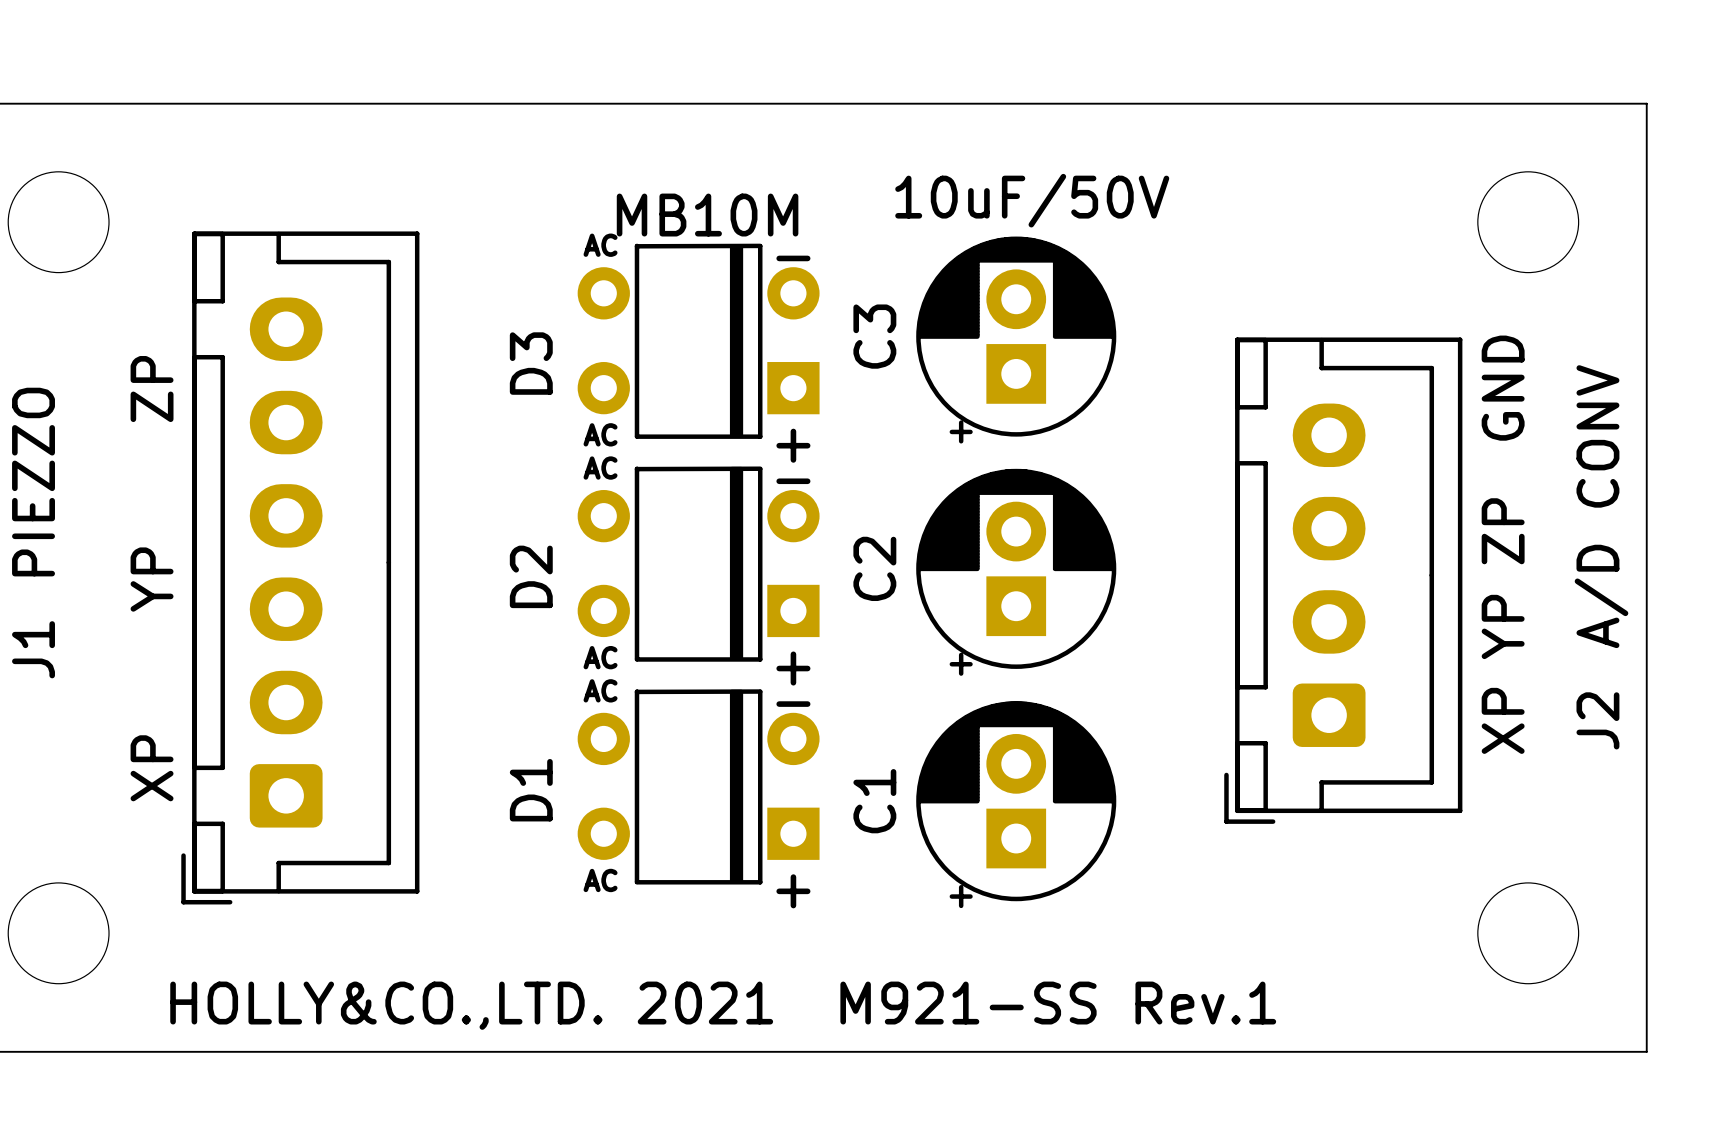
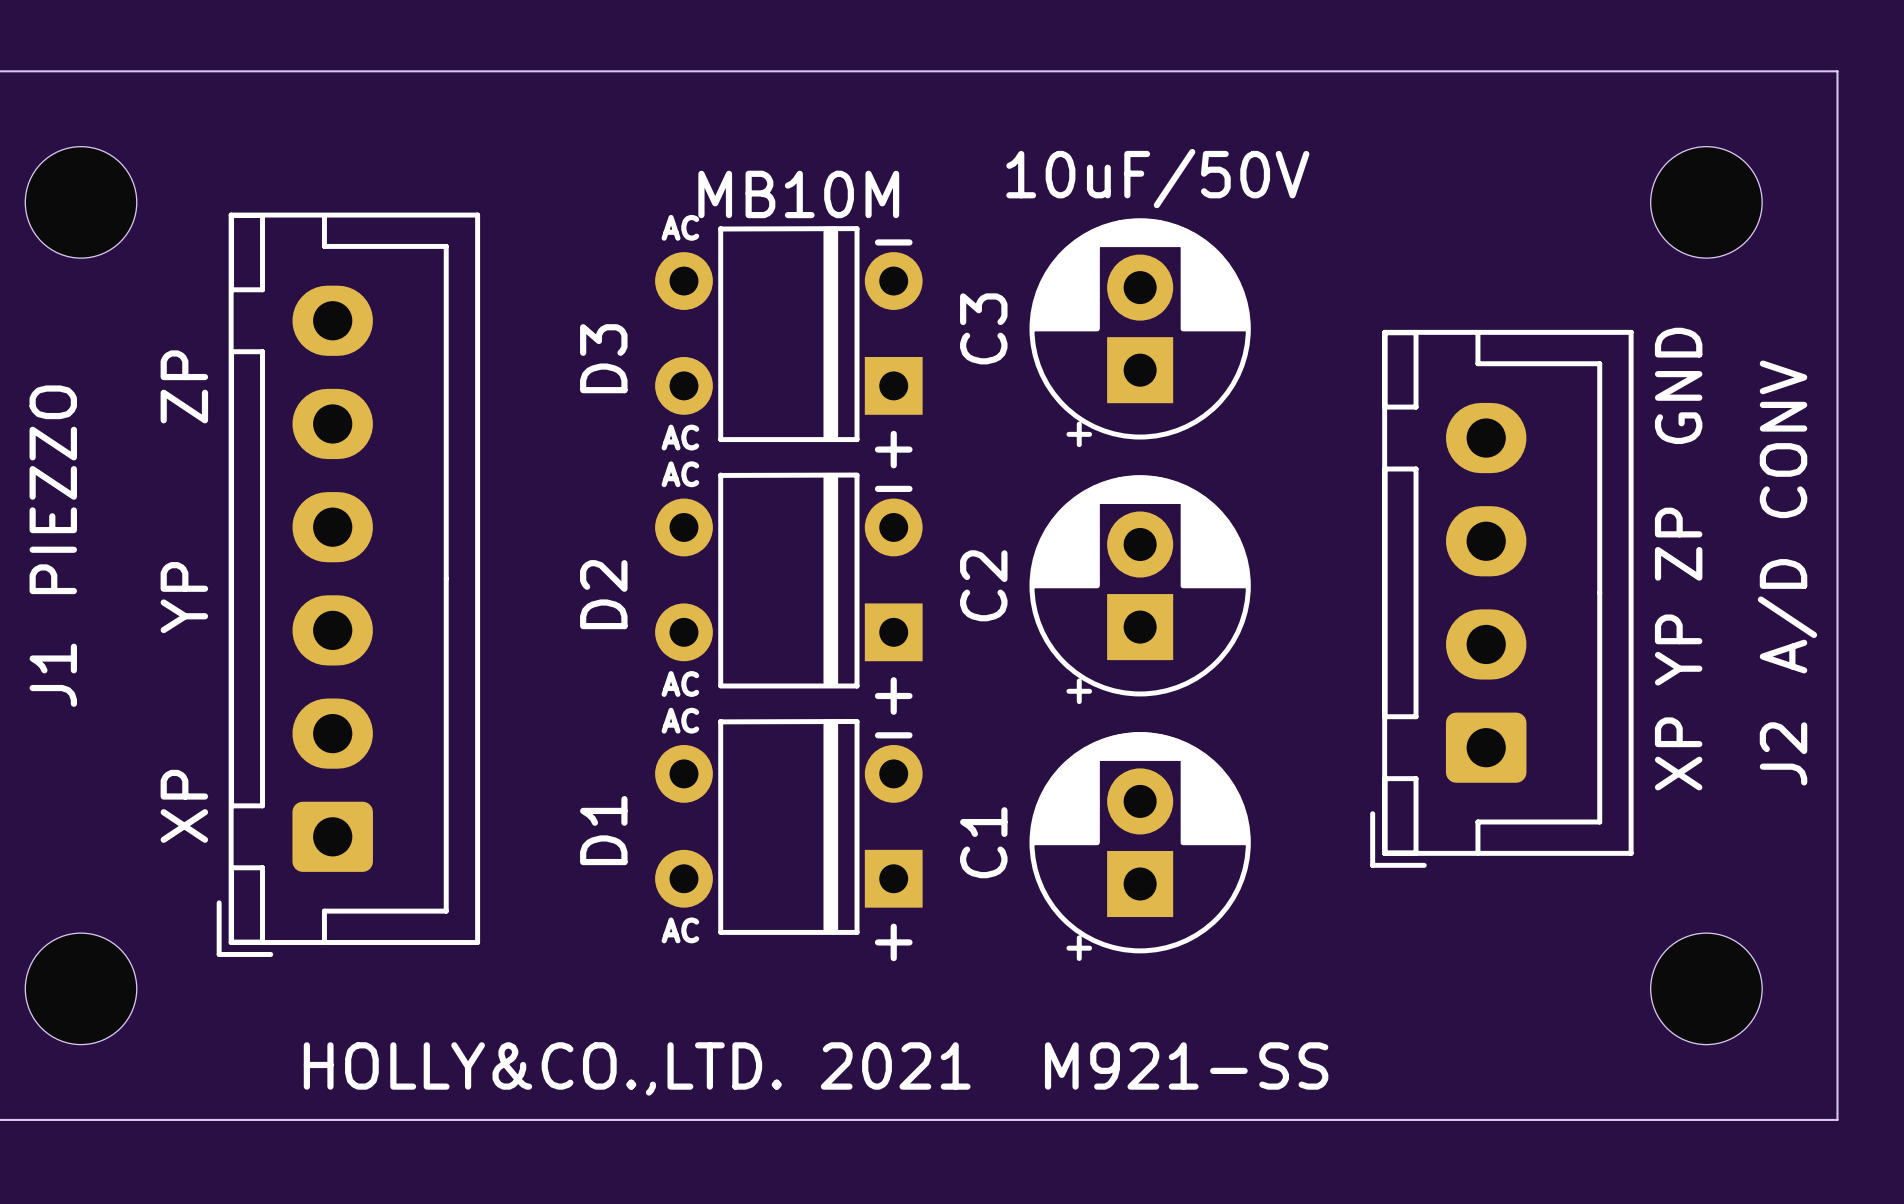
text: HOLLY&CO.,LTD. 2021 M921-SS Rev.1 (723, 1005) -> HOLLY&CO.,LTD. 2021 M921-SS (816, 1068)

